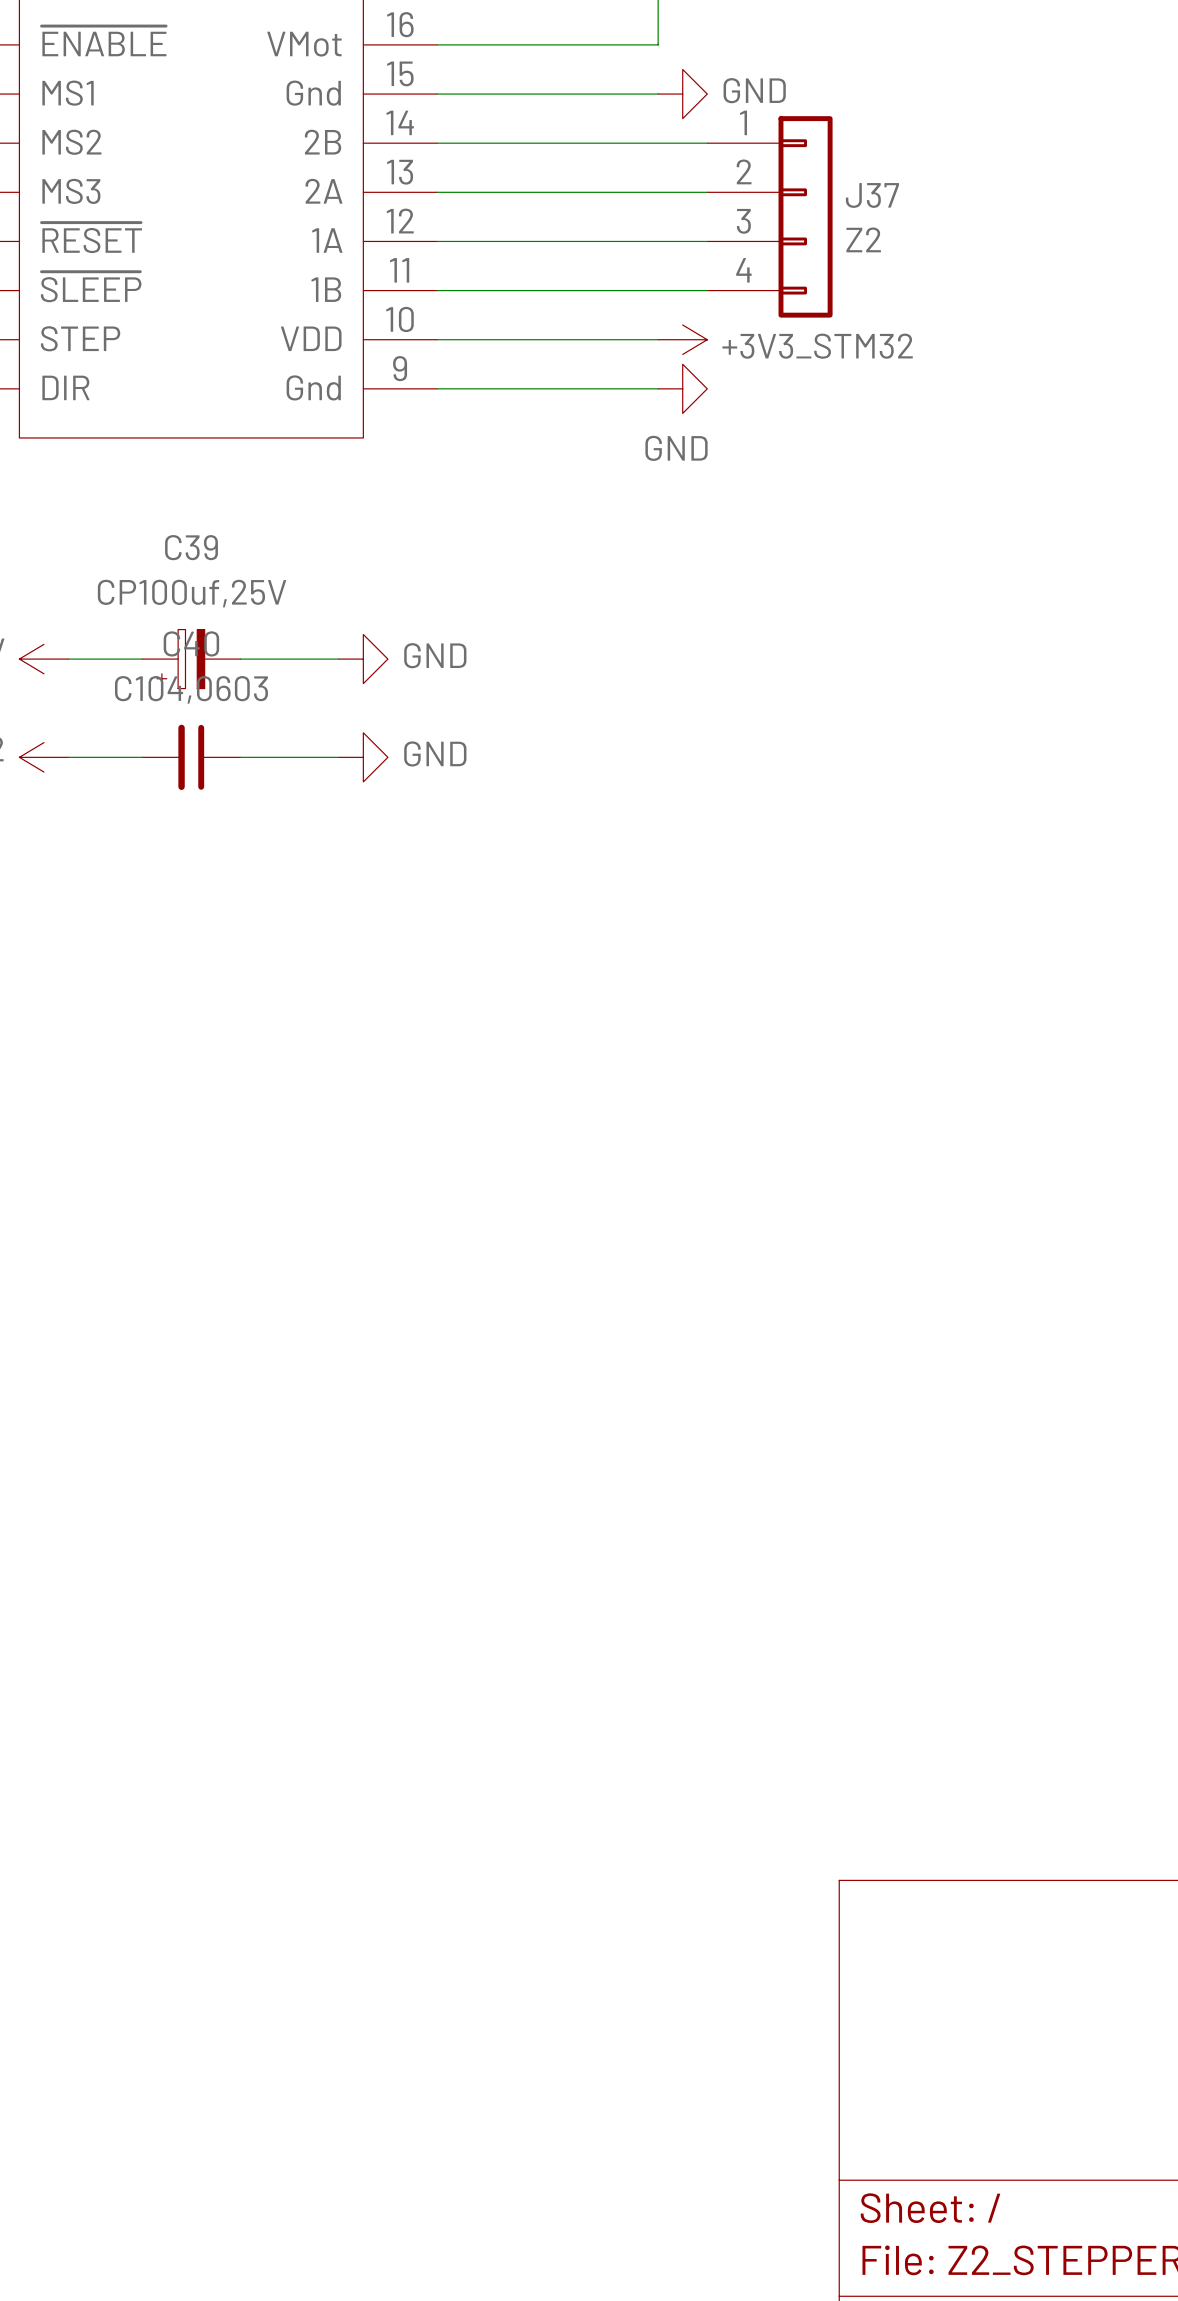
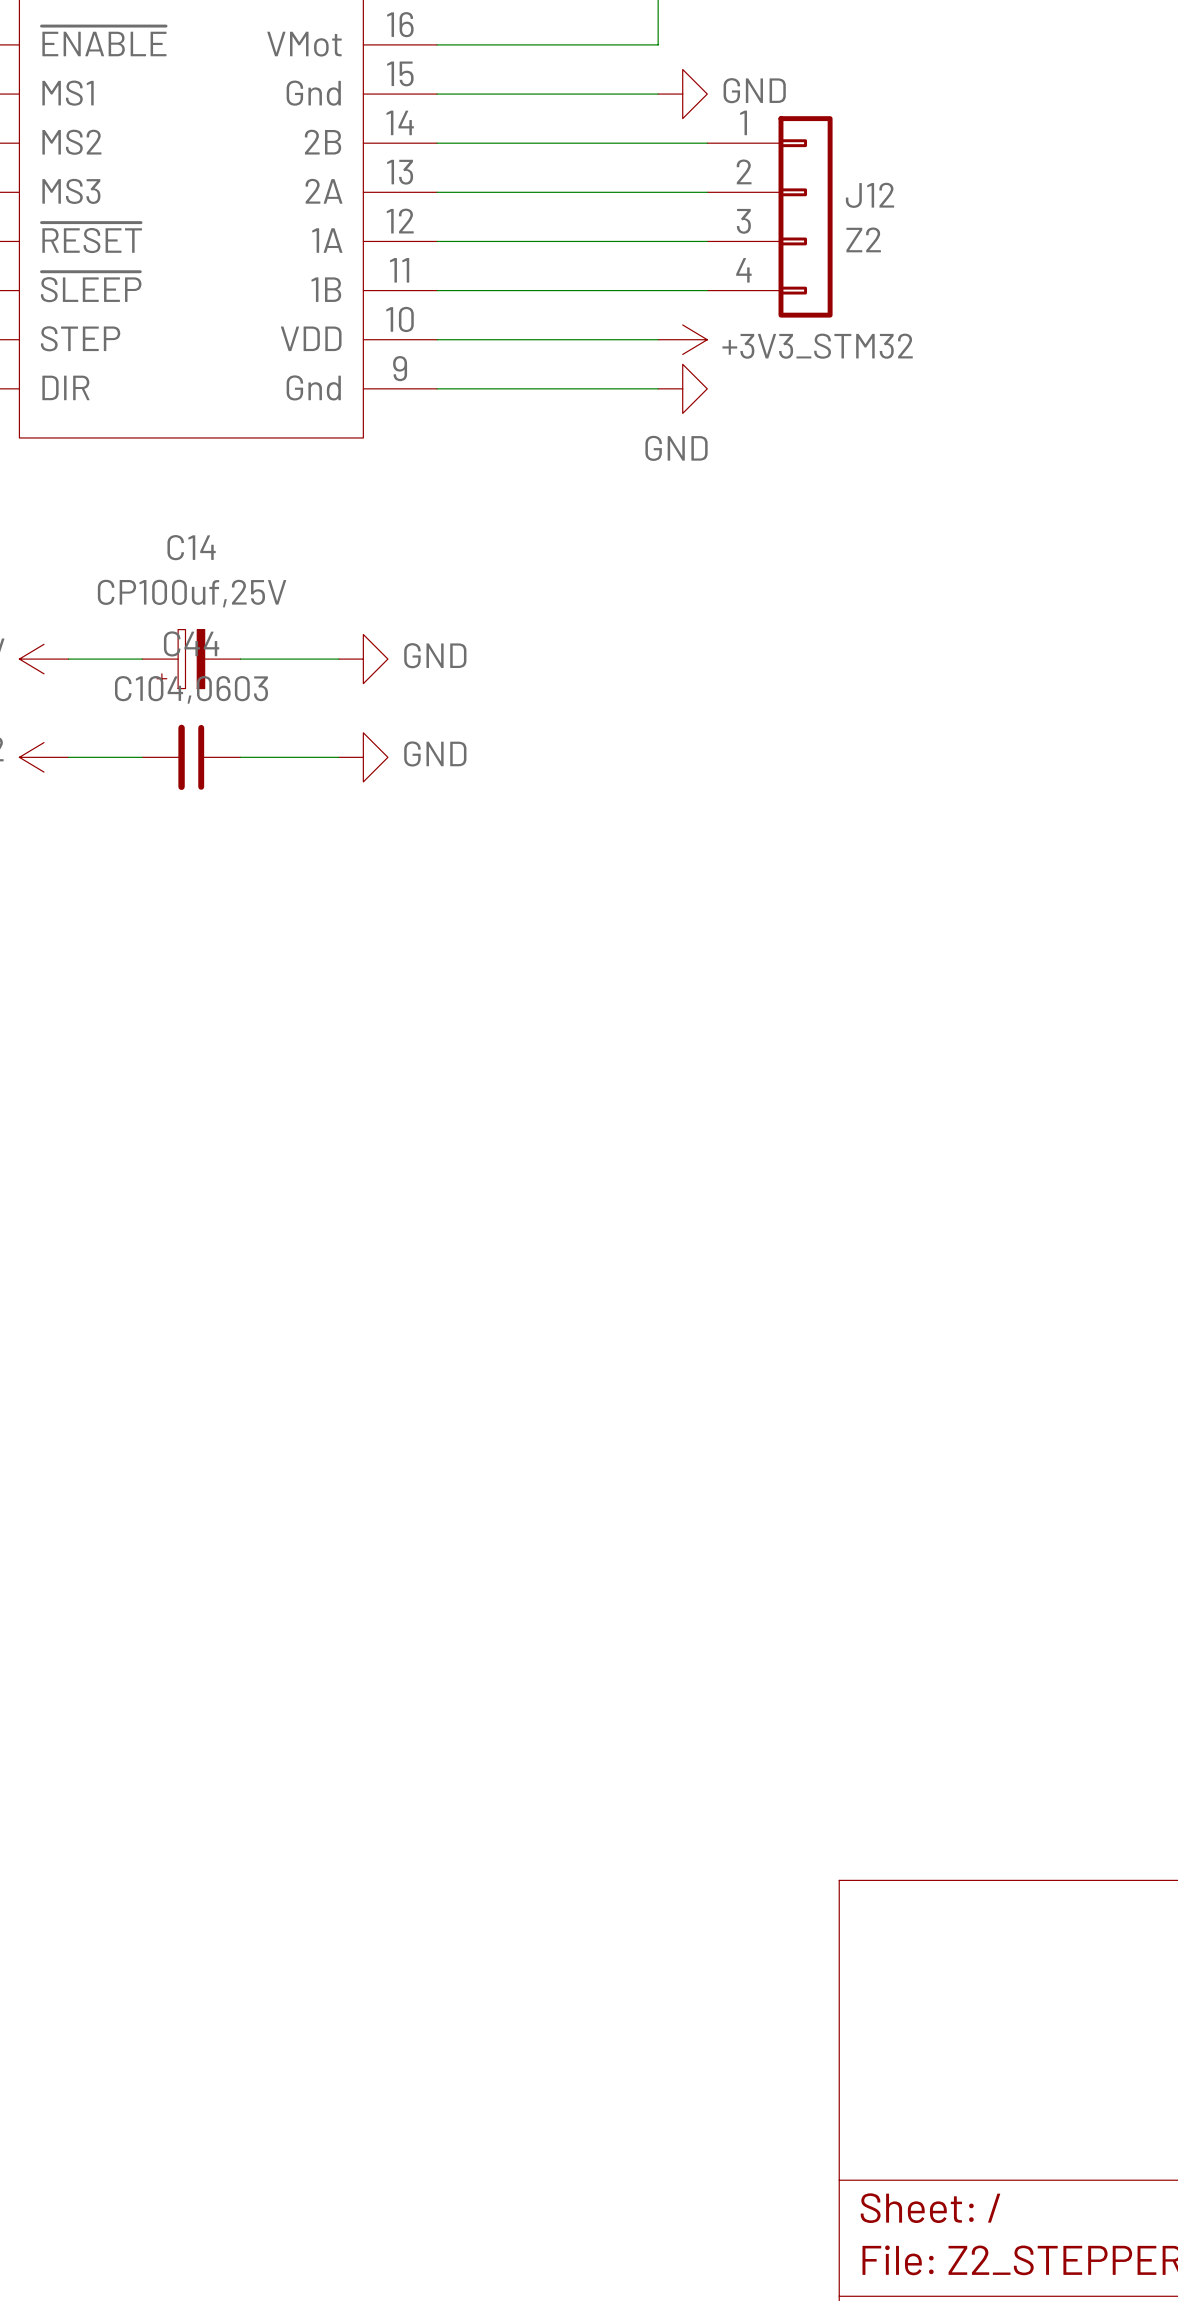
J37 name: J37 (872, 195) -> J12 (870, 195)
C39 name: C39 (191, 547) -> C14 (191, 547)
C40 name: C40 (191, 643) -> C44 (191, 643)

